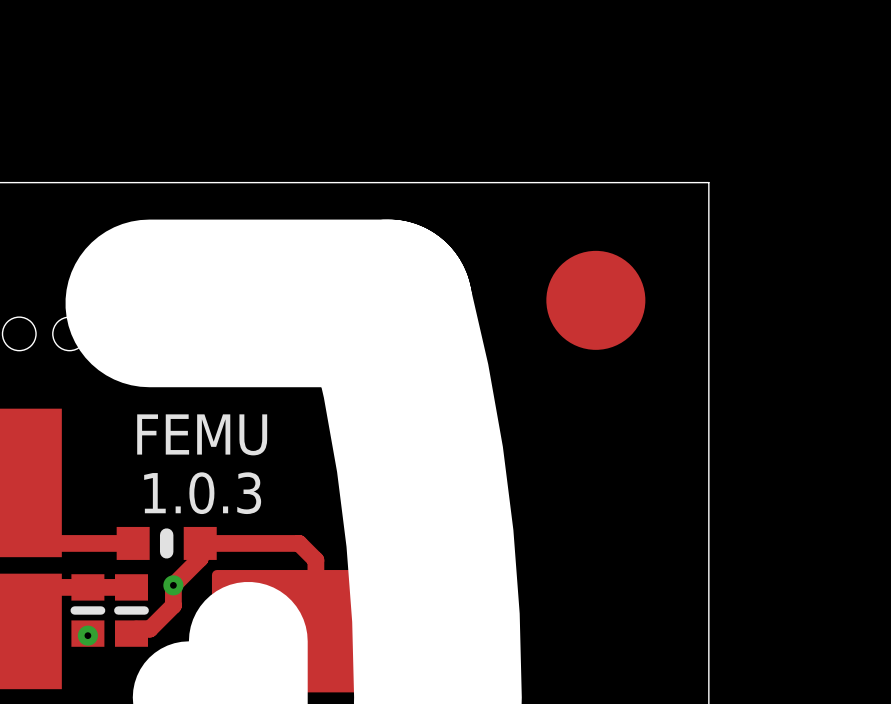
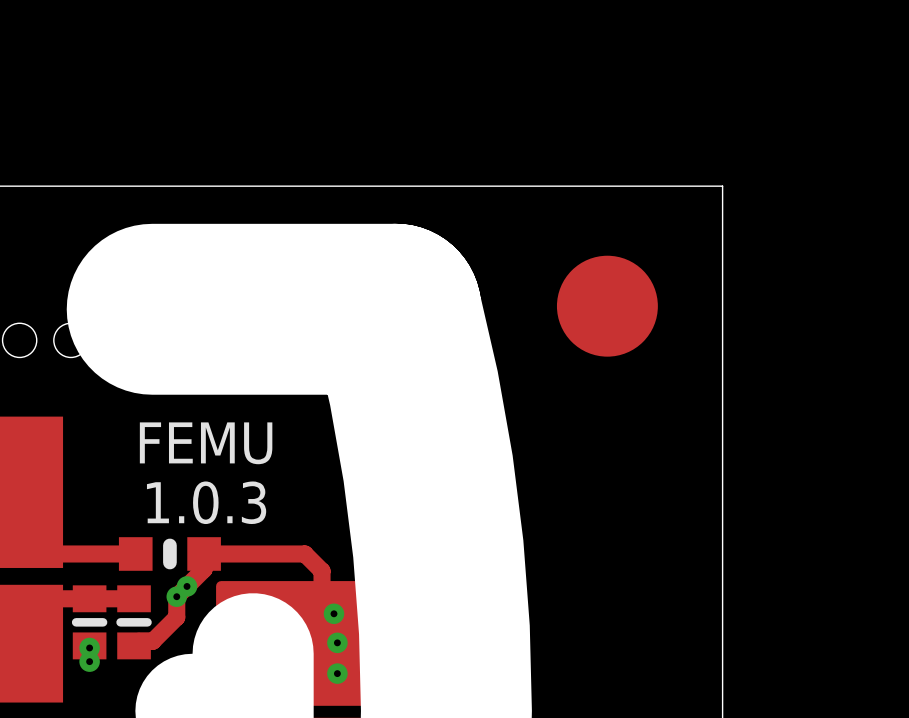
via: none -> (187, 586)
via: none -> (333, 613)
via: none -> (337, 642)
via: none -> (89, 661)
via: none -> (337, 673)

